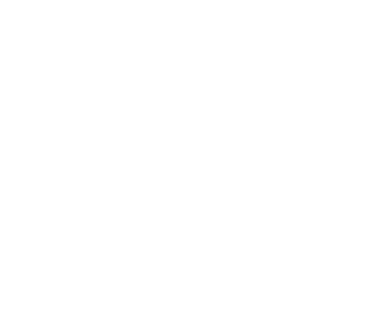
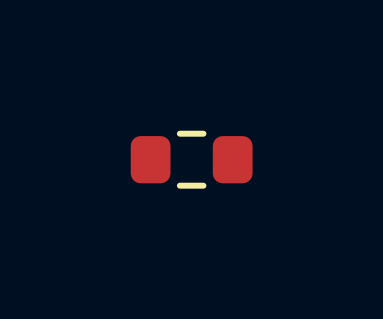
part: none -> (191, 159)

